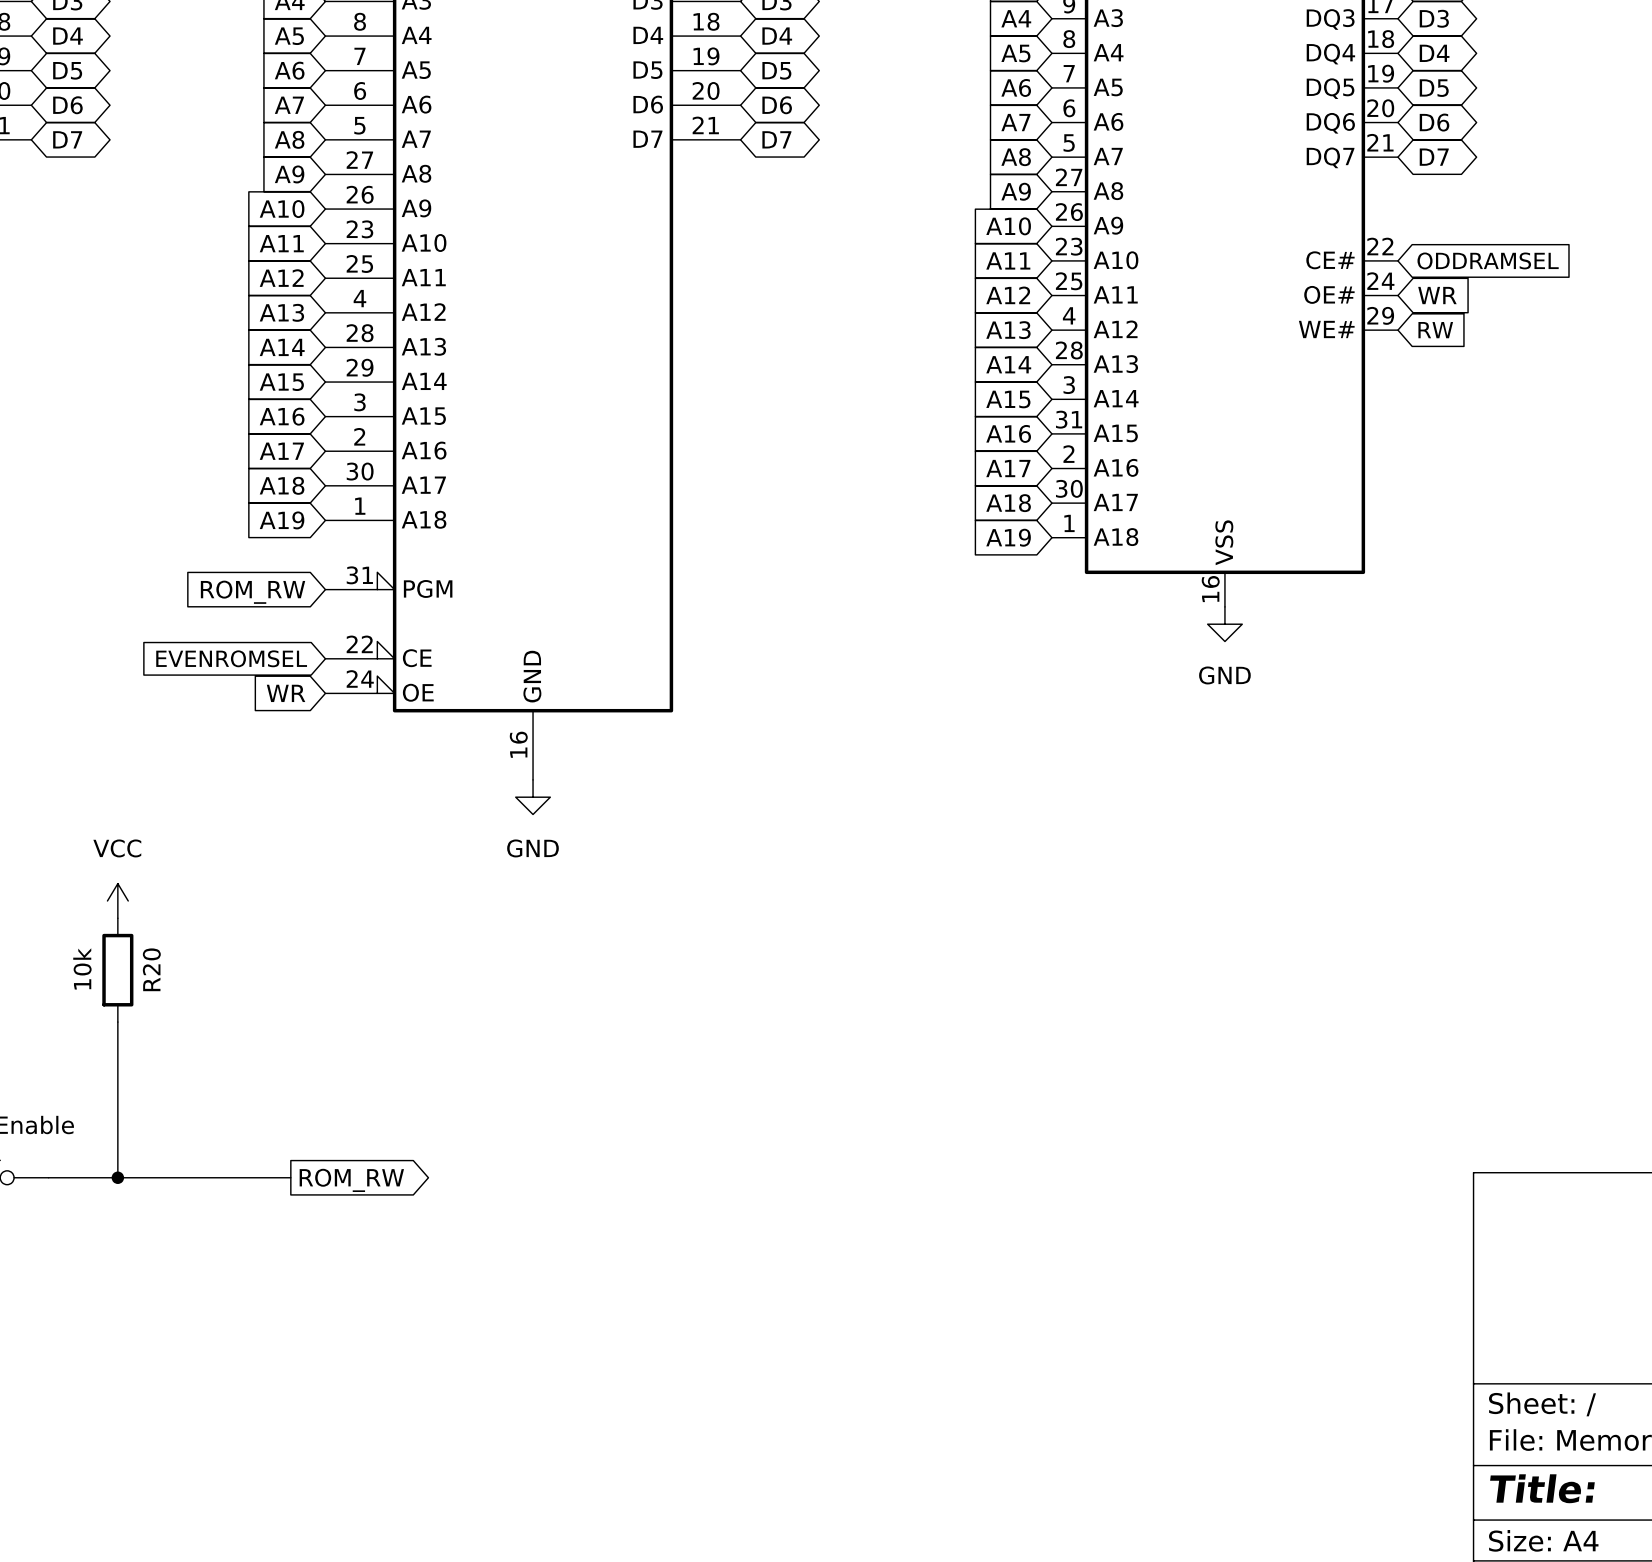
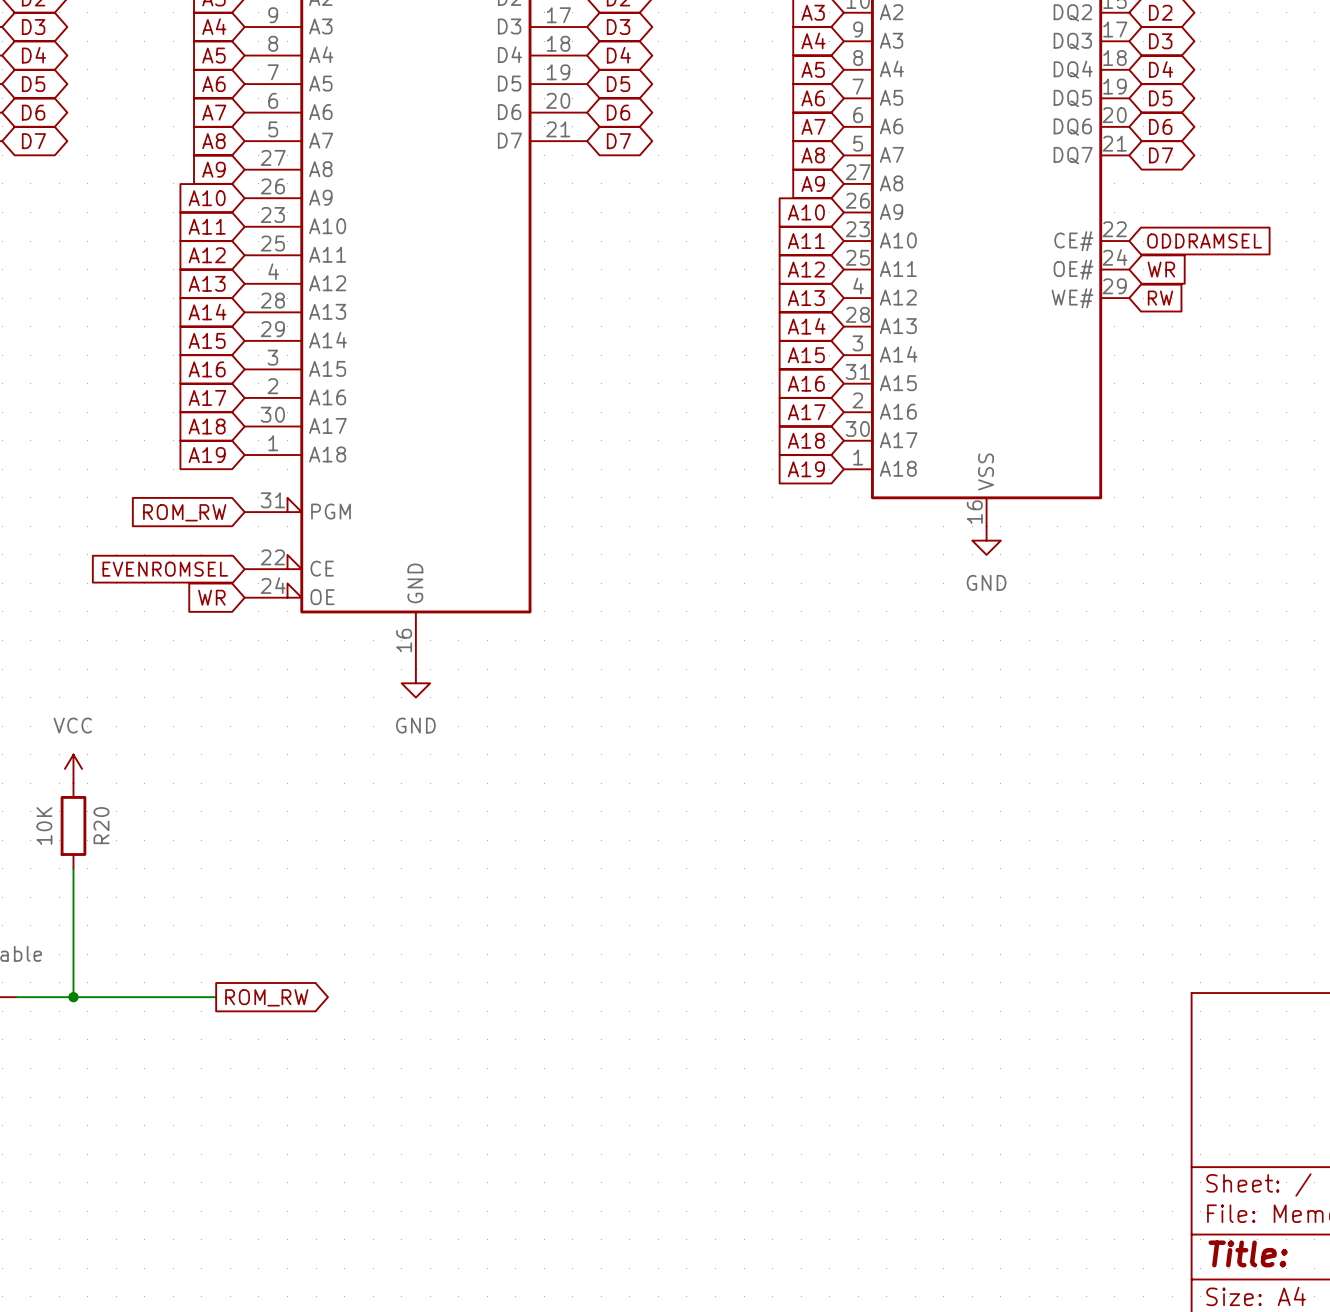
R20 value: 10k (82, 968) -> 10K (44, 825)

